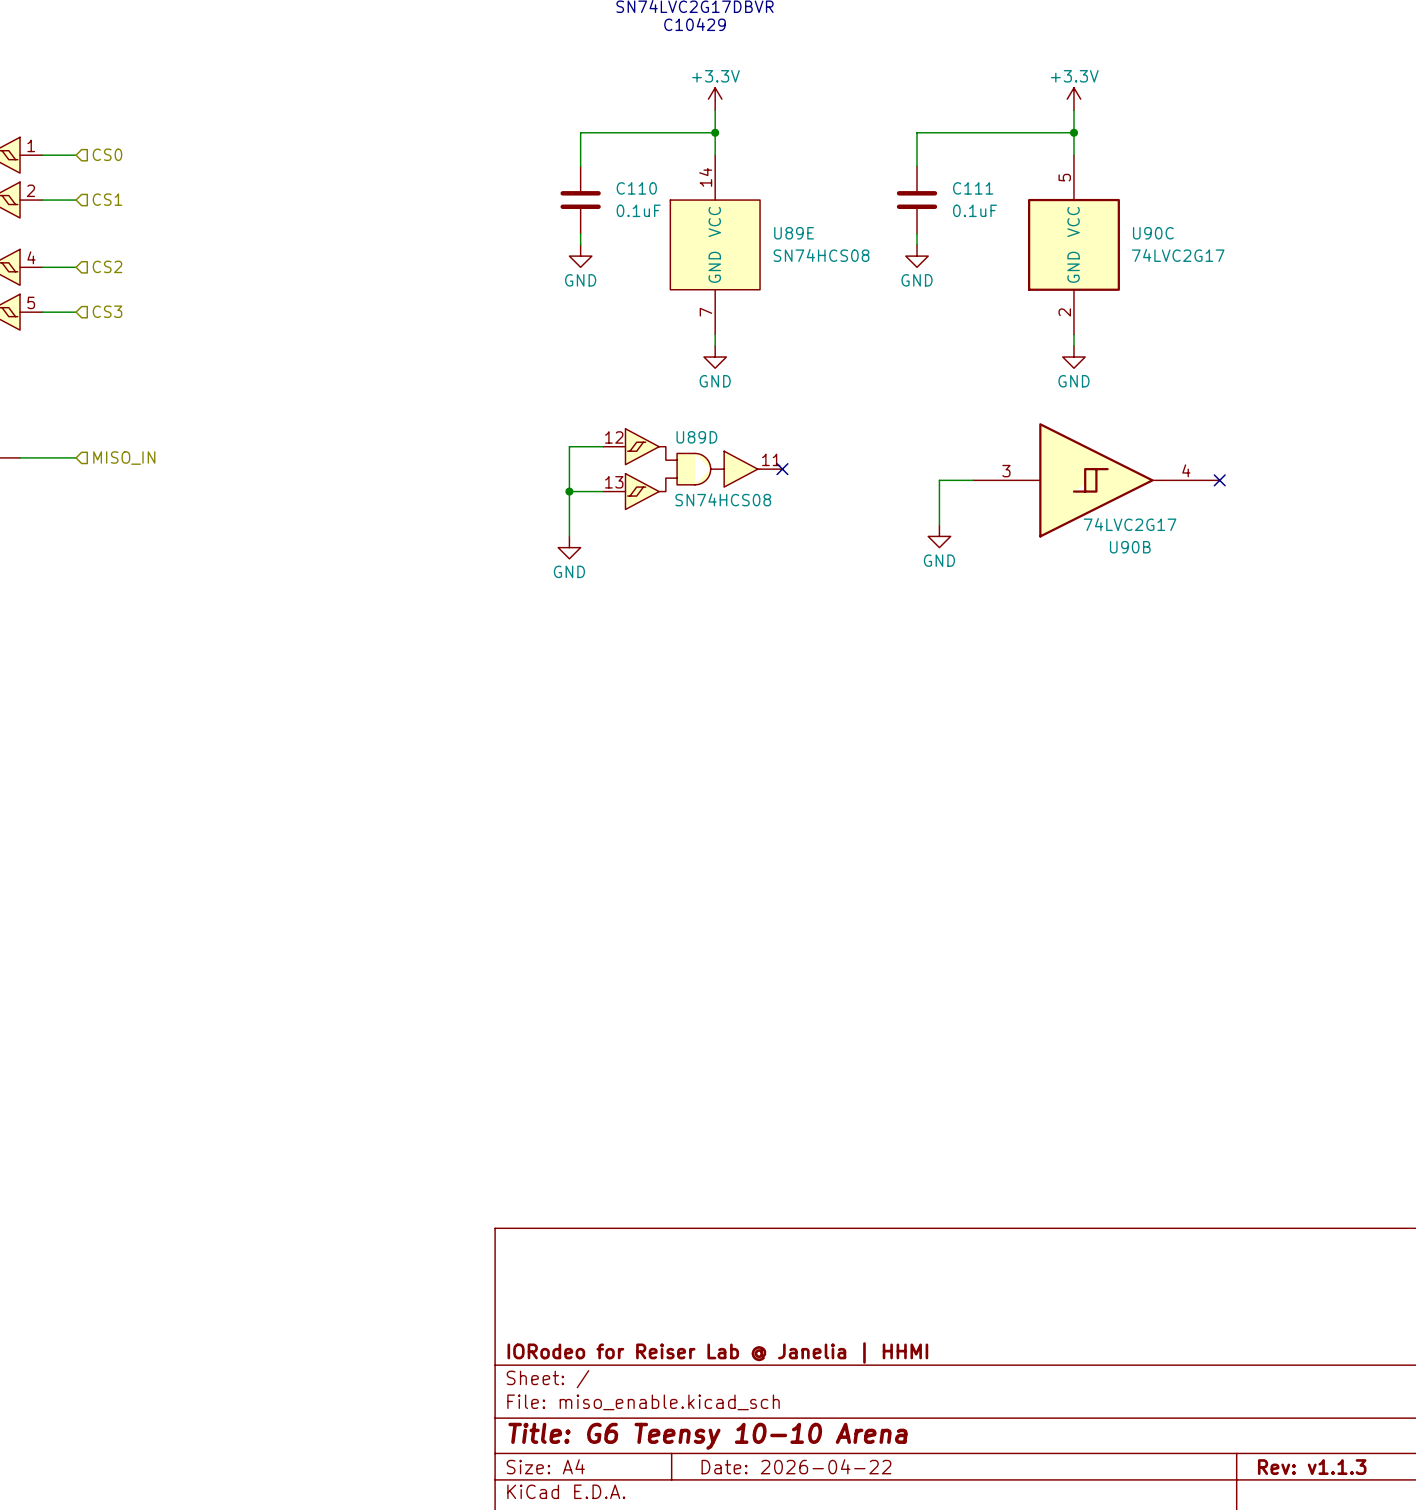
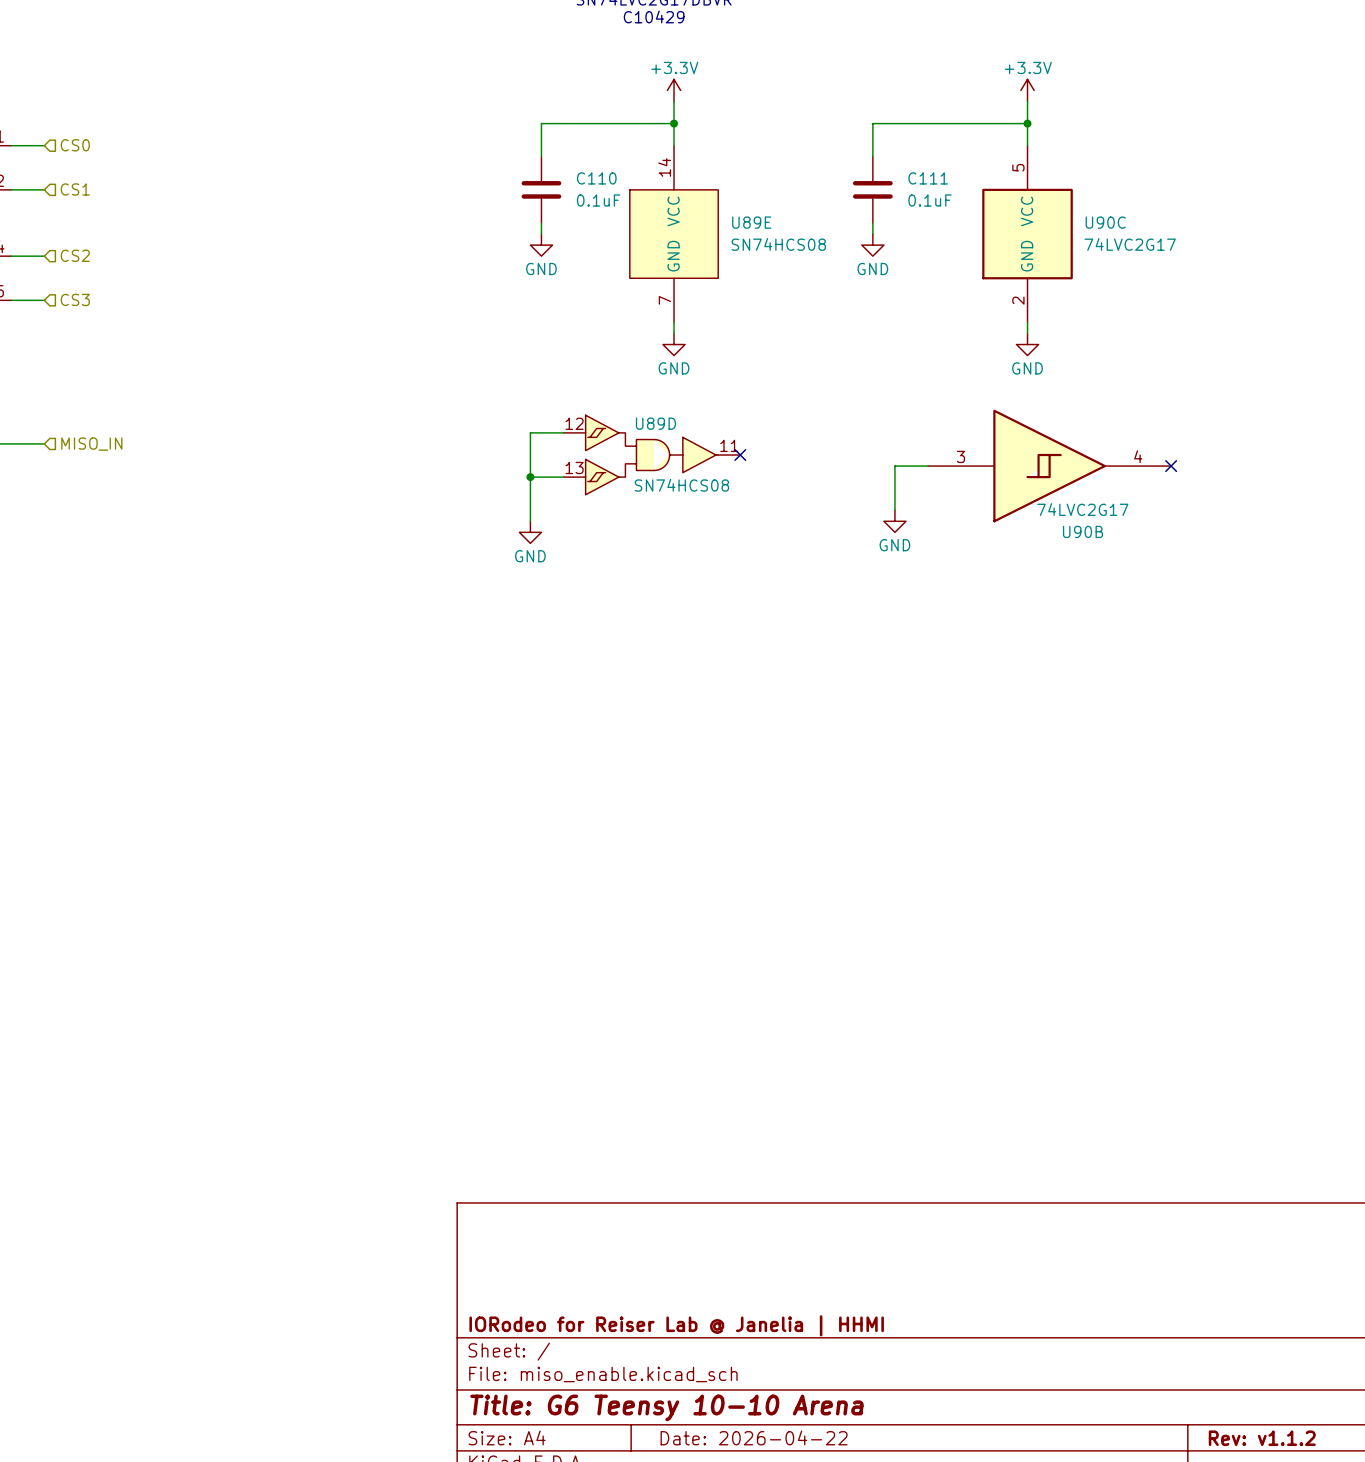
title block: Rev: v1.1.3 (1312, 1467) -> Rev: v1.1.2 (1262, 1438)

